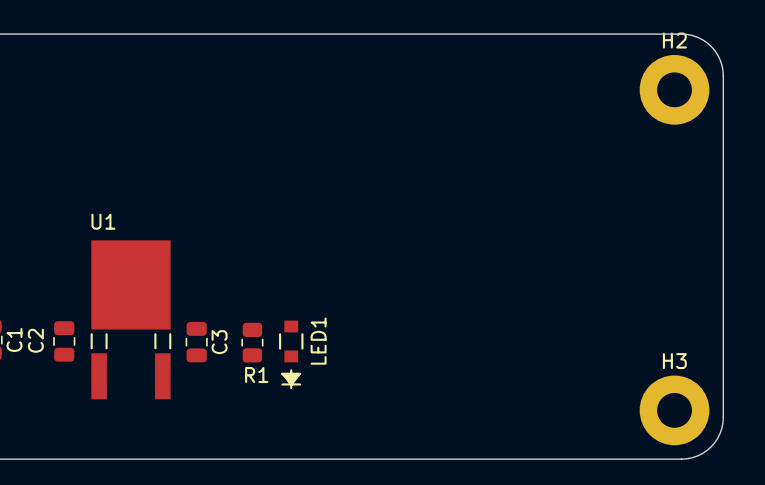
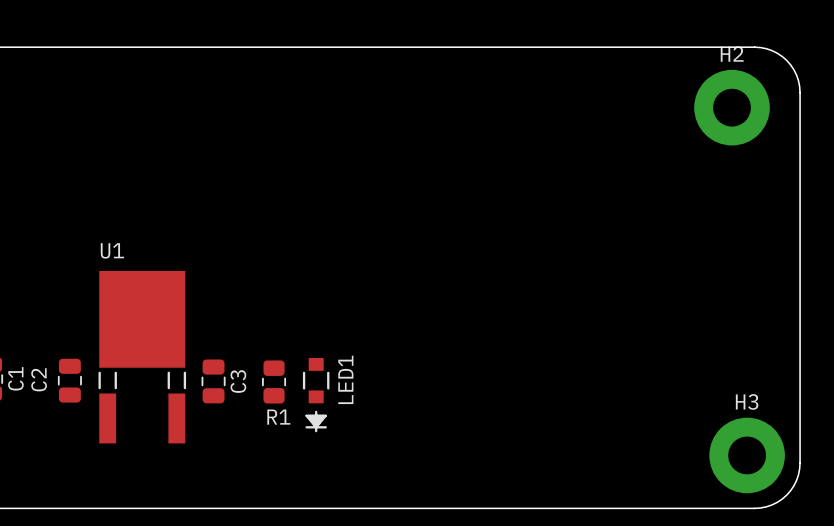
board edge: (681, 34) (697, 37) (711, 46) (720, 59) (723, 75) (722, 422) (717, 438) (706, 450) (692, 457) (681, 459) -> (739, 47) (766, 48) (782, 56) (790, 64) (796, 75) (800, 92) (799, 468) (793, 485) (786, 495) (777, 502) (760, 507) (739, 508)
H3 position: (674, 410) -> (747, 455)

